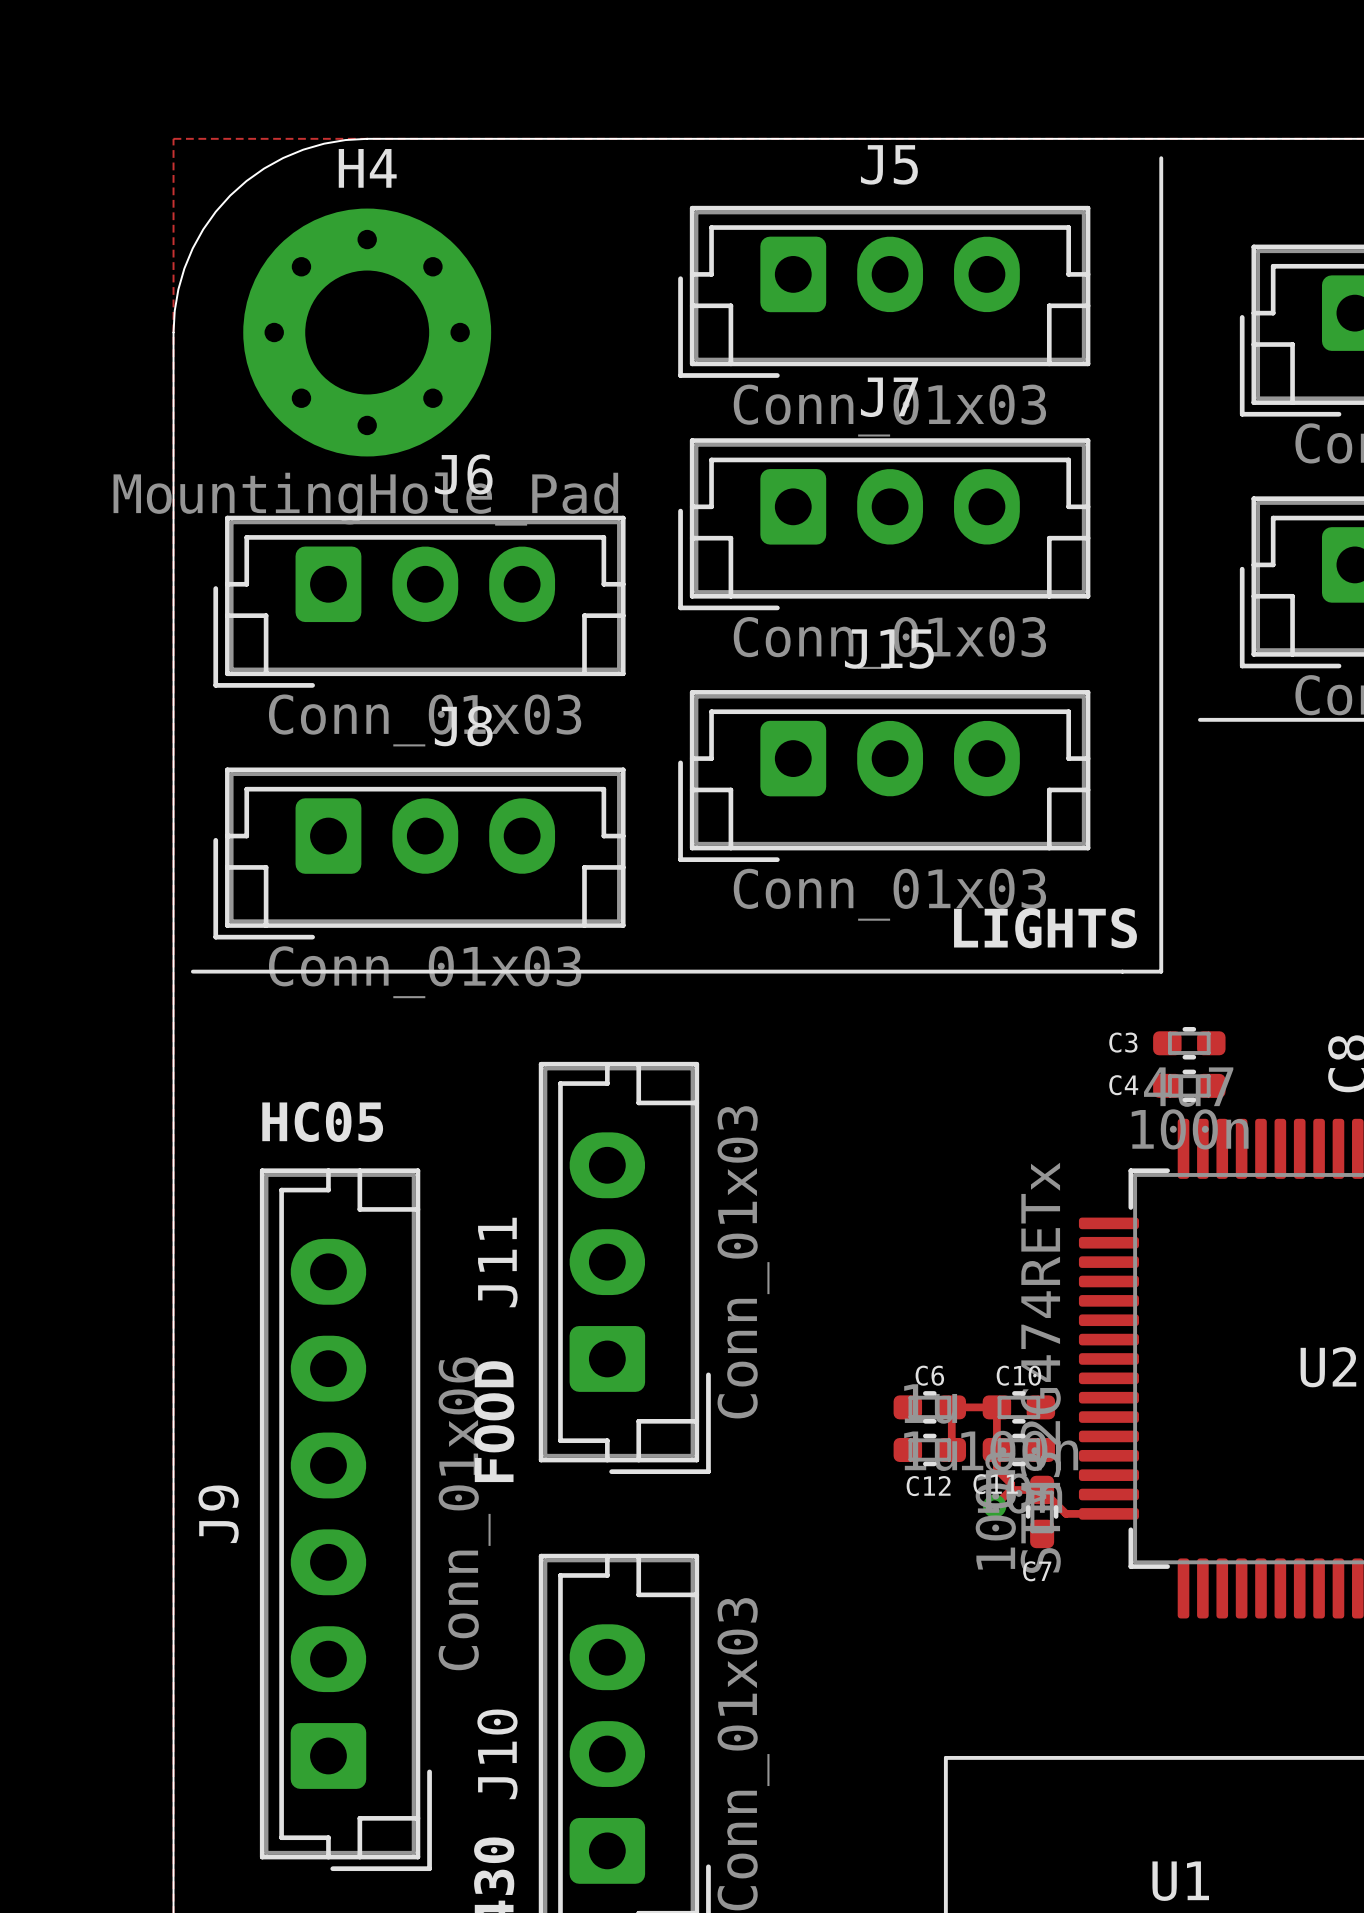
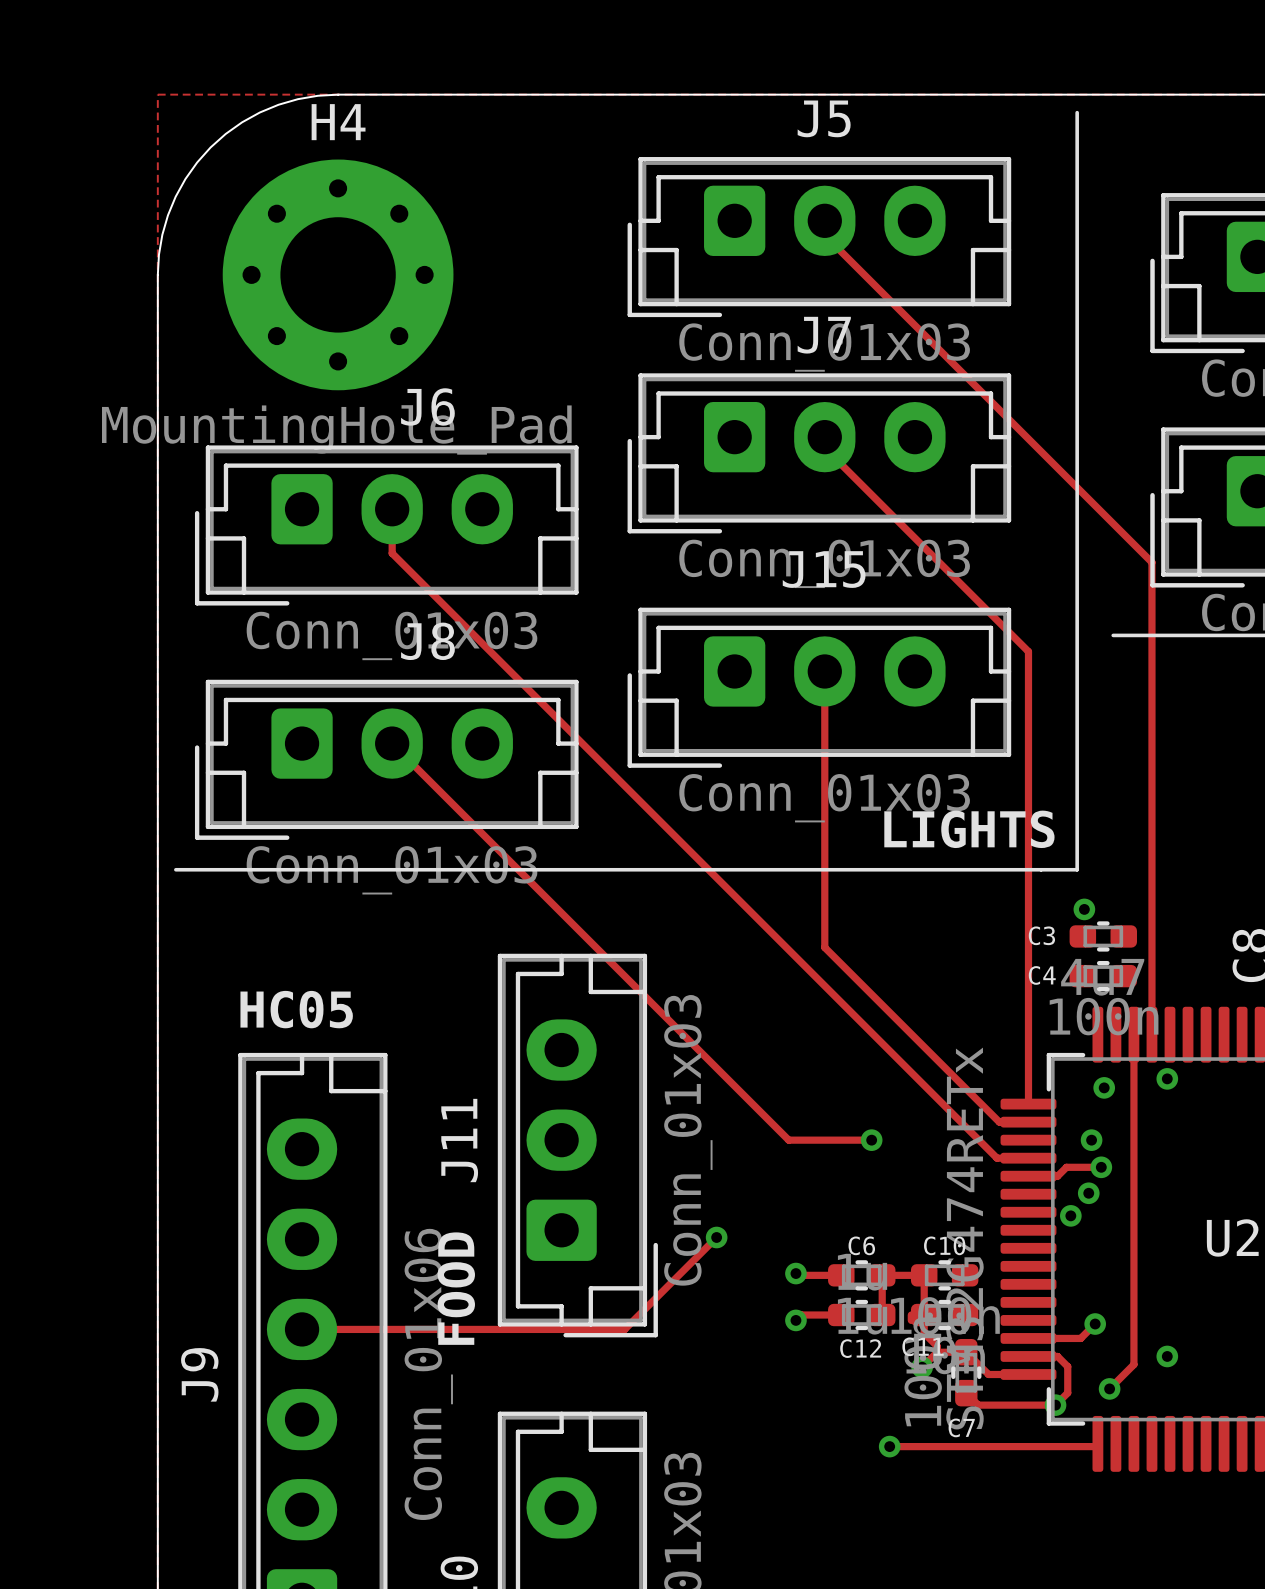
track: none -> (824, 220) (824, 235) (1151, 562) (1151, 1034)
track: none -> (824, 437) (824, 447) (1028, 651) (1028, 1104)
track: none -> (392, 509) (392, 553) (997, 1158) (1028, 1158)
track: none -> (824, 671) (824, 947) (999, 1122) (1028, 1122)
track: none -> (392, 743) (788, 1140) (871, 1140)
via: none -> (1084, 909)
track: none -> (1133, 1034) (1133, 1364) (1109, 1388)
via: none -> (1167, 1078)
via: none -> (1104, 1087)
via: none -> (871, 1140)
via: none -> (1091, 1140)
track: none -> (1101, 1167) (1066, 1167) (1057, 1176) (1028, 1176)
via: none -> (1101, 1167)
via: none -> (1088, 1193)
via: none -> (1070, 1215)
track: none -> (716, 1237) (624, 1329) (302, 1329)
via: none -> (716, 1237)
track: none -> (795, 1273) (797, 1275) (828, 1275)
via: none -> (795, 1273)
track: none -> (828, 1315) (801, 1315) (795, 1320)
track: none -> (911, 1315) (911, 1320)
via: none -> (795, 1320)
track: none -> (1095, 1324) (1080, 1338) (1028, 1338)
via: none -> (1095, 1324)
track: none -> (1028, 1356) (1057, 1356) (1067, 1366) (1067, 1392) (1055, 1405) (978, 1405) (966, 1393)
via: none -> (1167, 1356)
via: none -> (1109, 1388)
via: none -> (1055, 1405)
track: none -> (1097, 1443) (1095, 1446) (889, 1446)
via: none -> (889, 1446)

